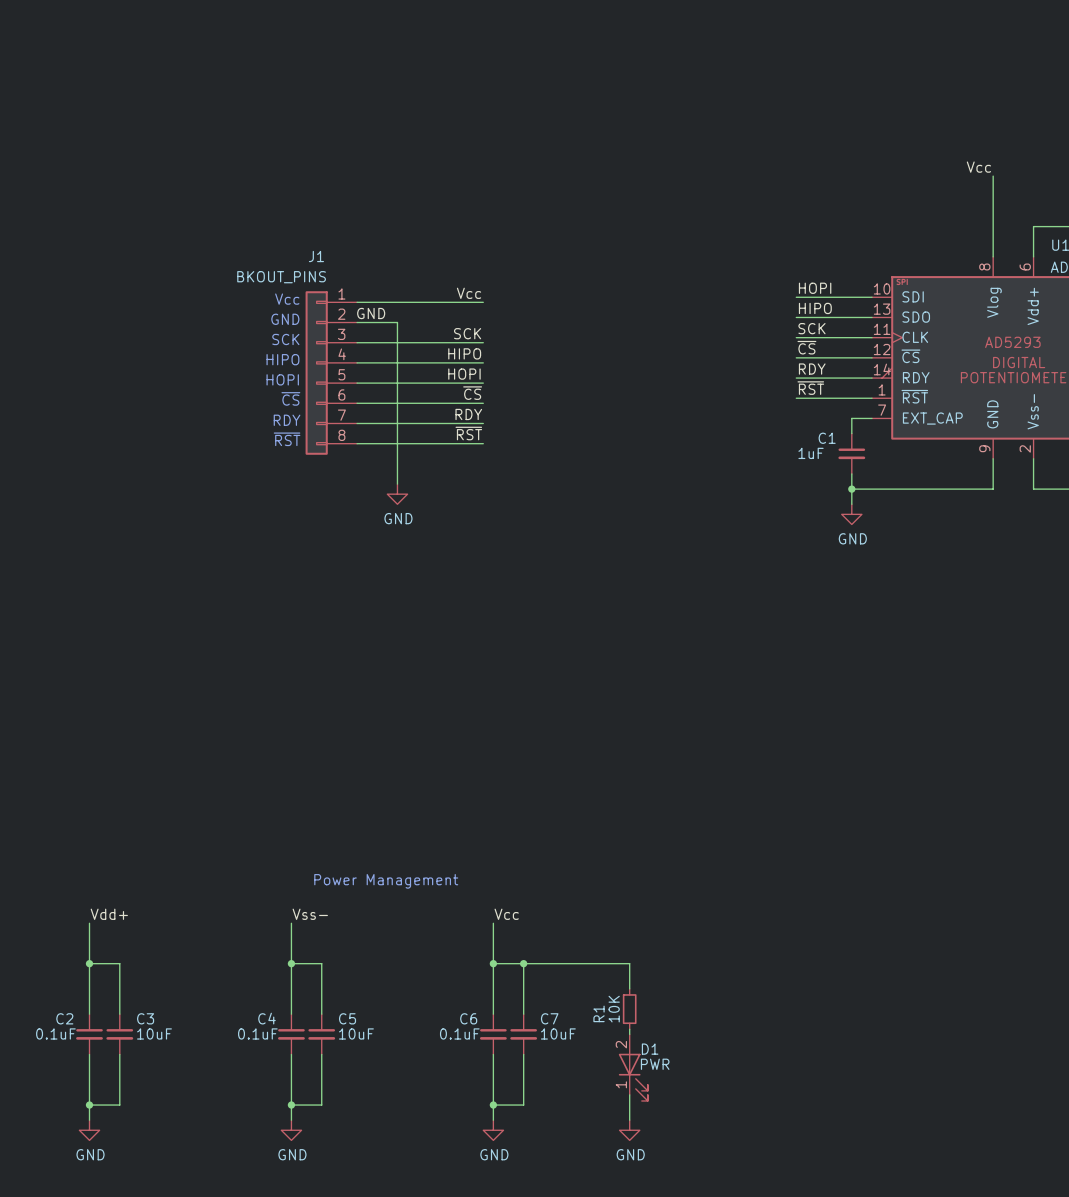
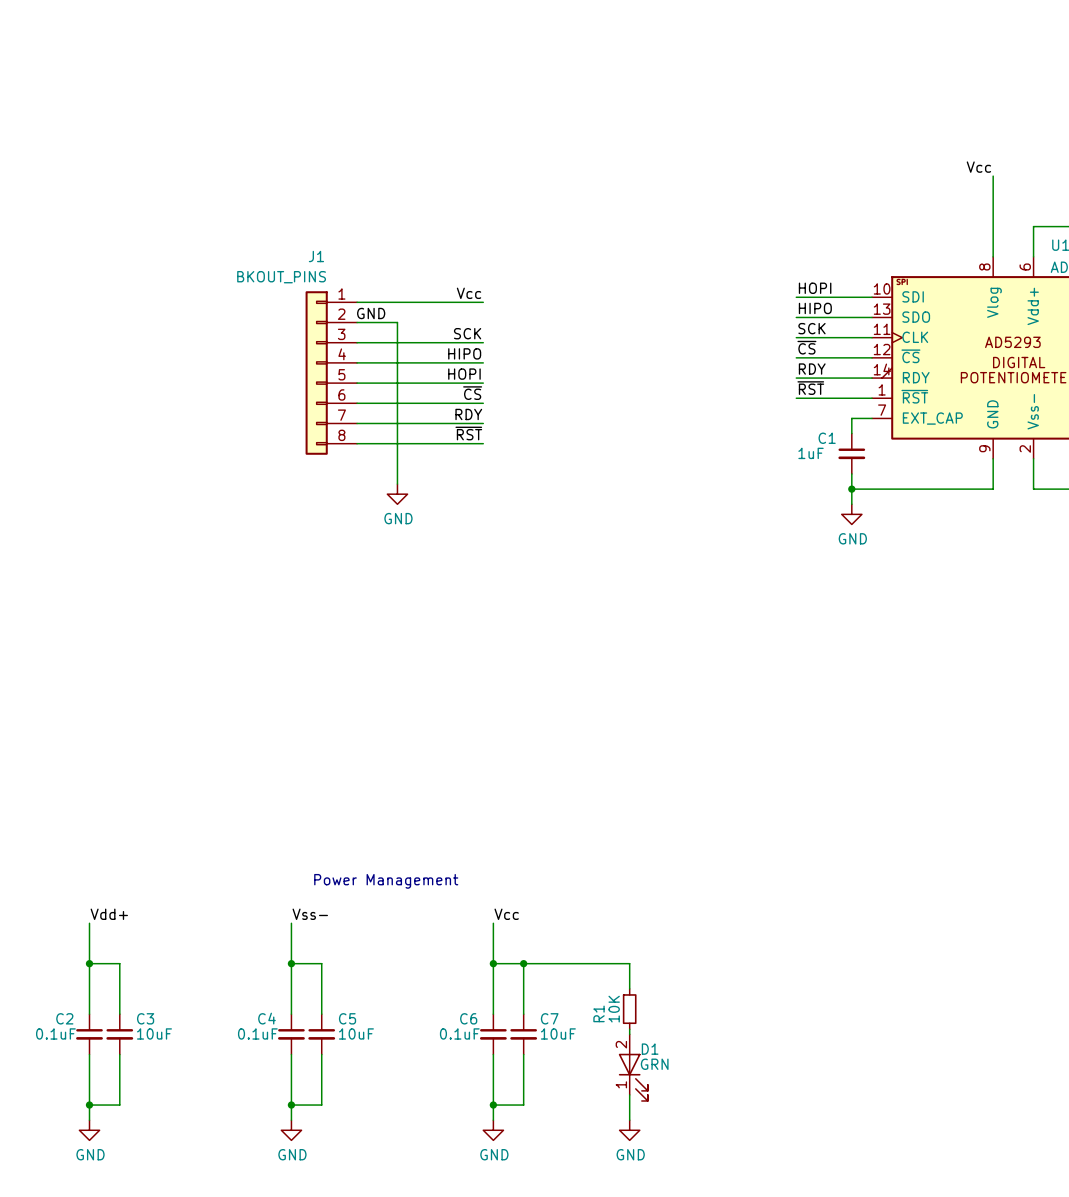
text: Vcc (287, 299) -> none
text: GND (285, 319) -> none
text: SCK (285, 339) -> none
text: HIPO (282, 359) -> none
text: HOPI (282, 379) -> none
text: ~{CS} (290, 398) -> none
text: RDY (287, 420) -> none
text: ~{RST} (287, 439) -> none
D1 value: PWR (655, 1064) -> GRN (654, 1064)

